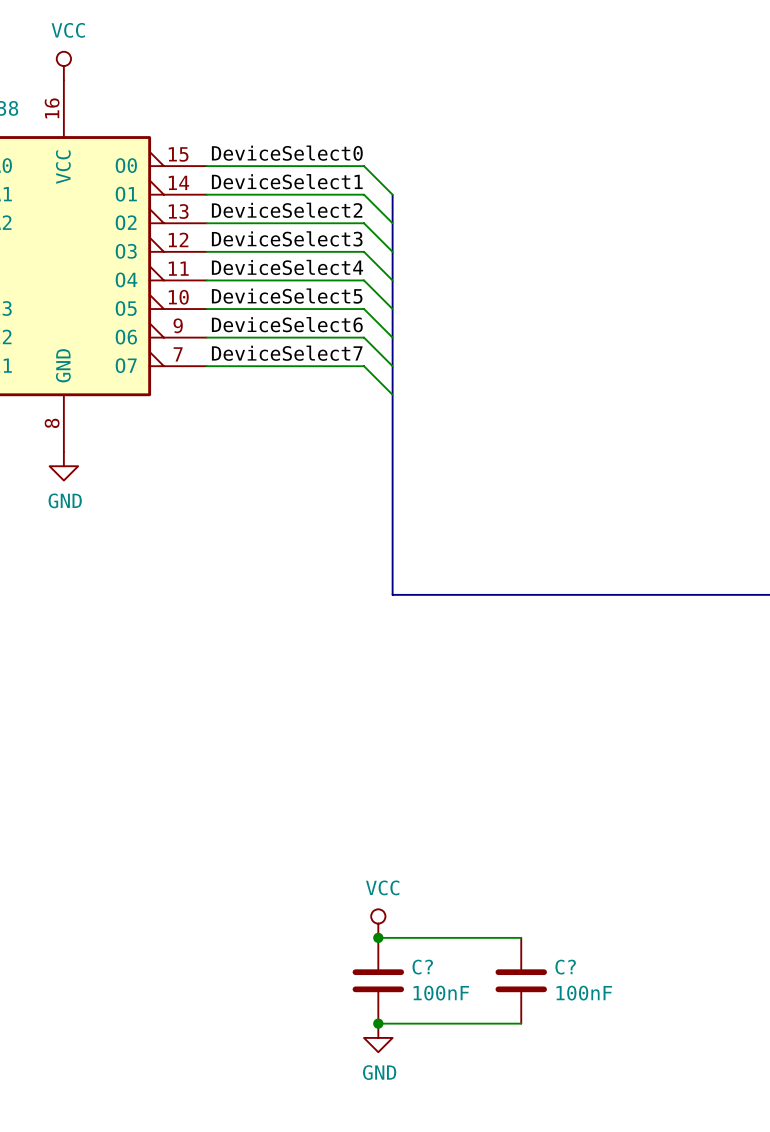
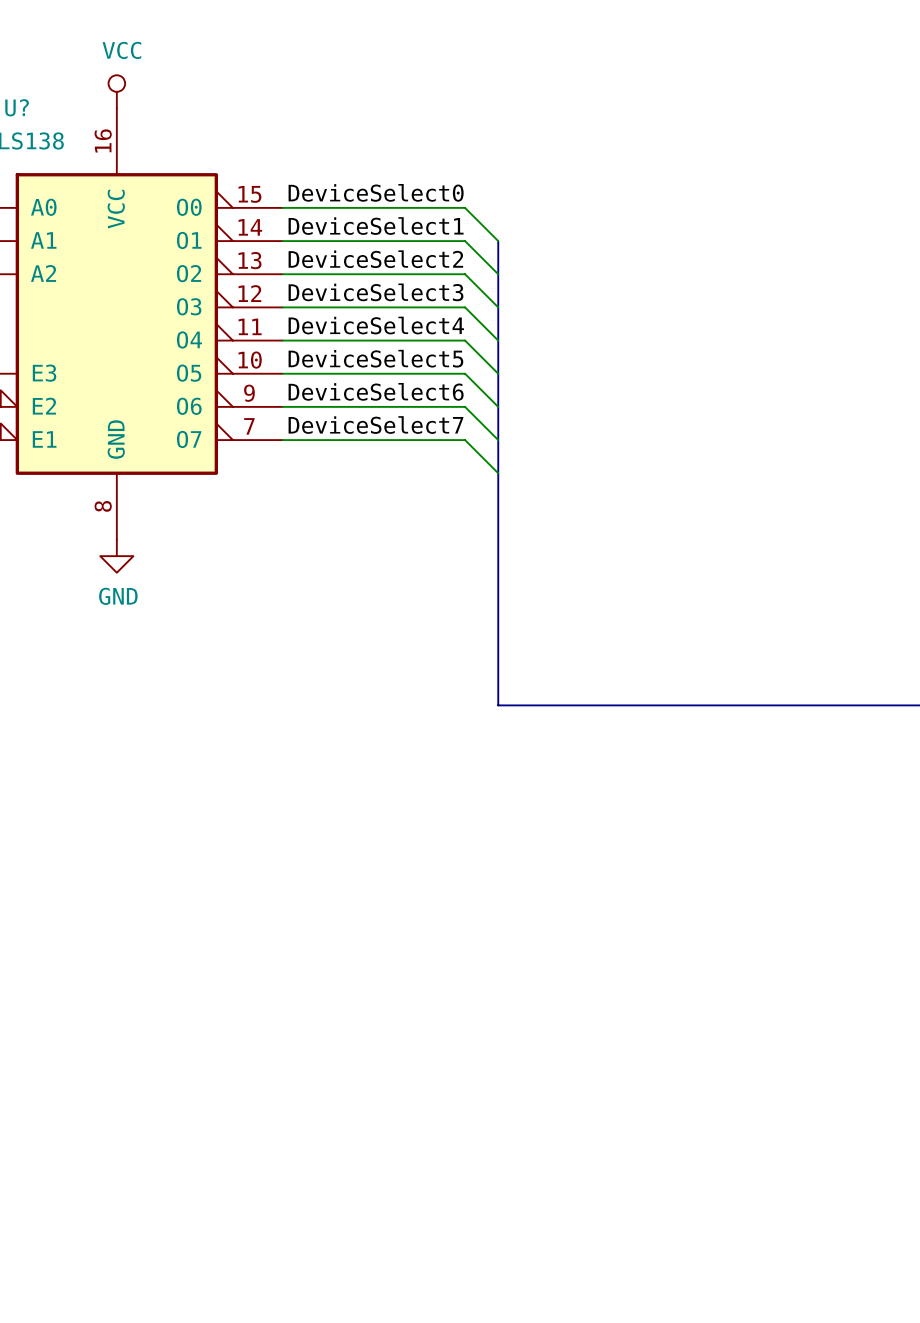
power symbol: VCC (378, 923) -> none
wire: (378, 937) (521, 937) -> none
junction: (378, 937) -> none
C?: 100nF (378, 980) -> none
C?: 100nF (521, 980) -> none
wire: (378, 1023) (521, 1023) -> none
junction: (378, 1023) -> none
power symbol: GND (378, 1037) -> none

